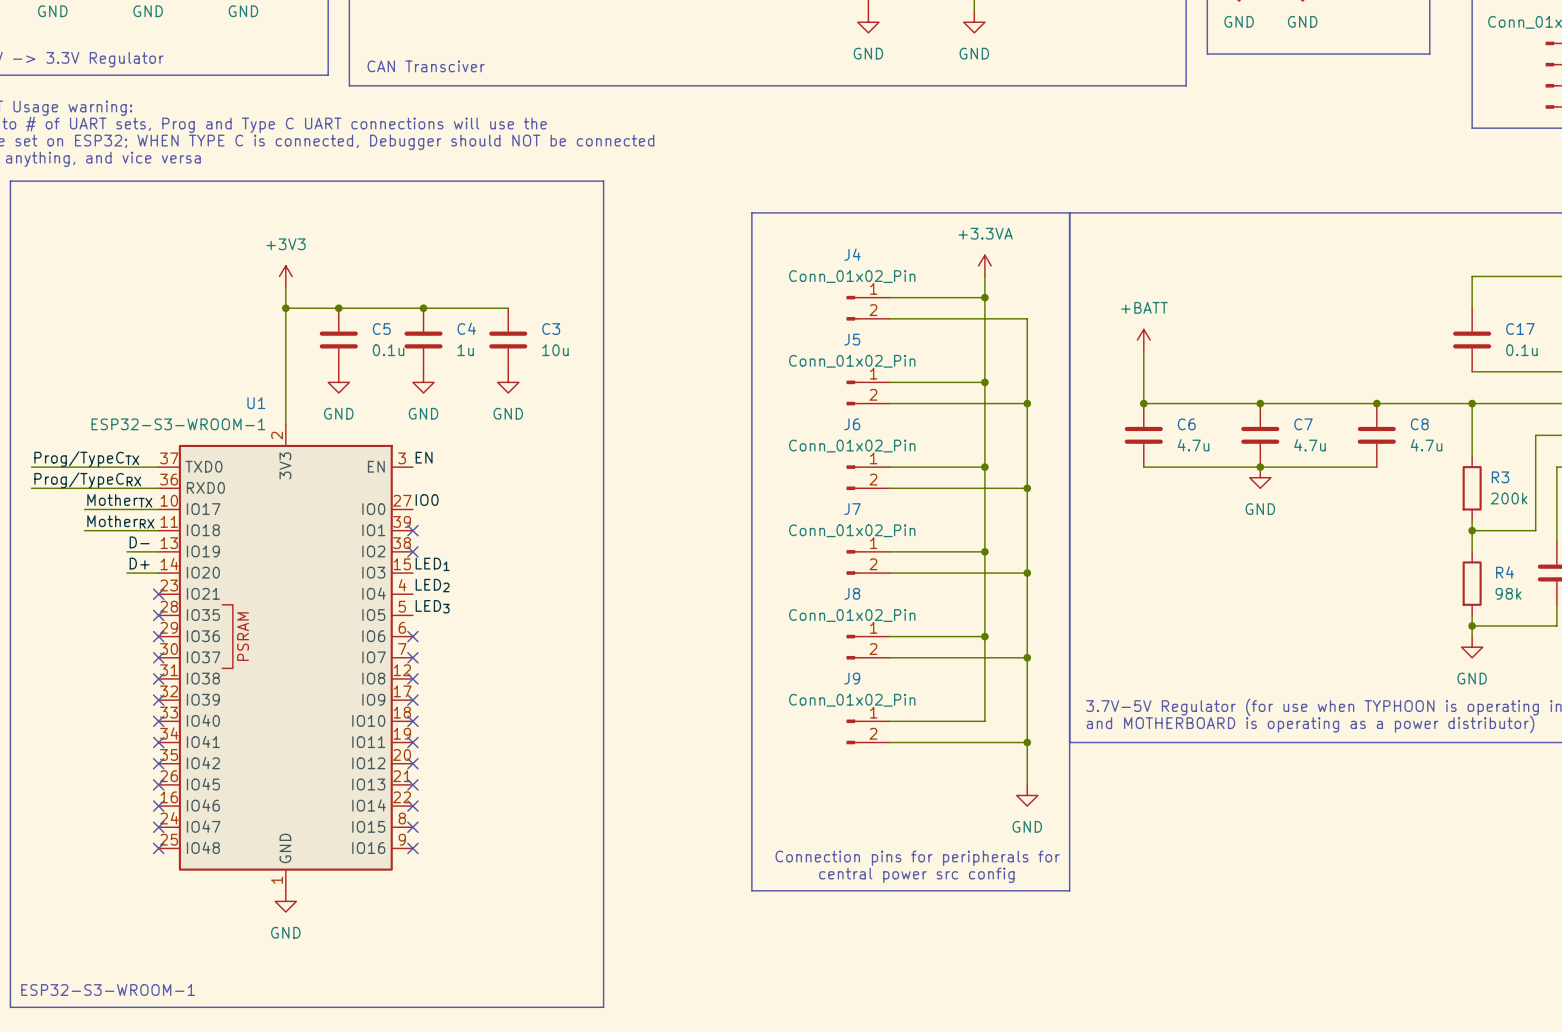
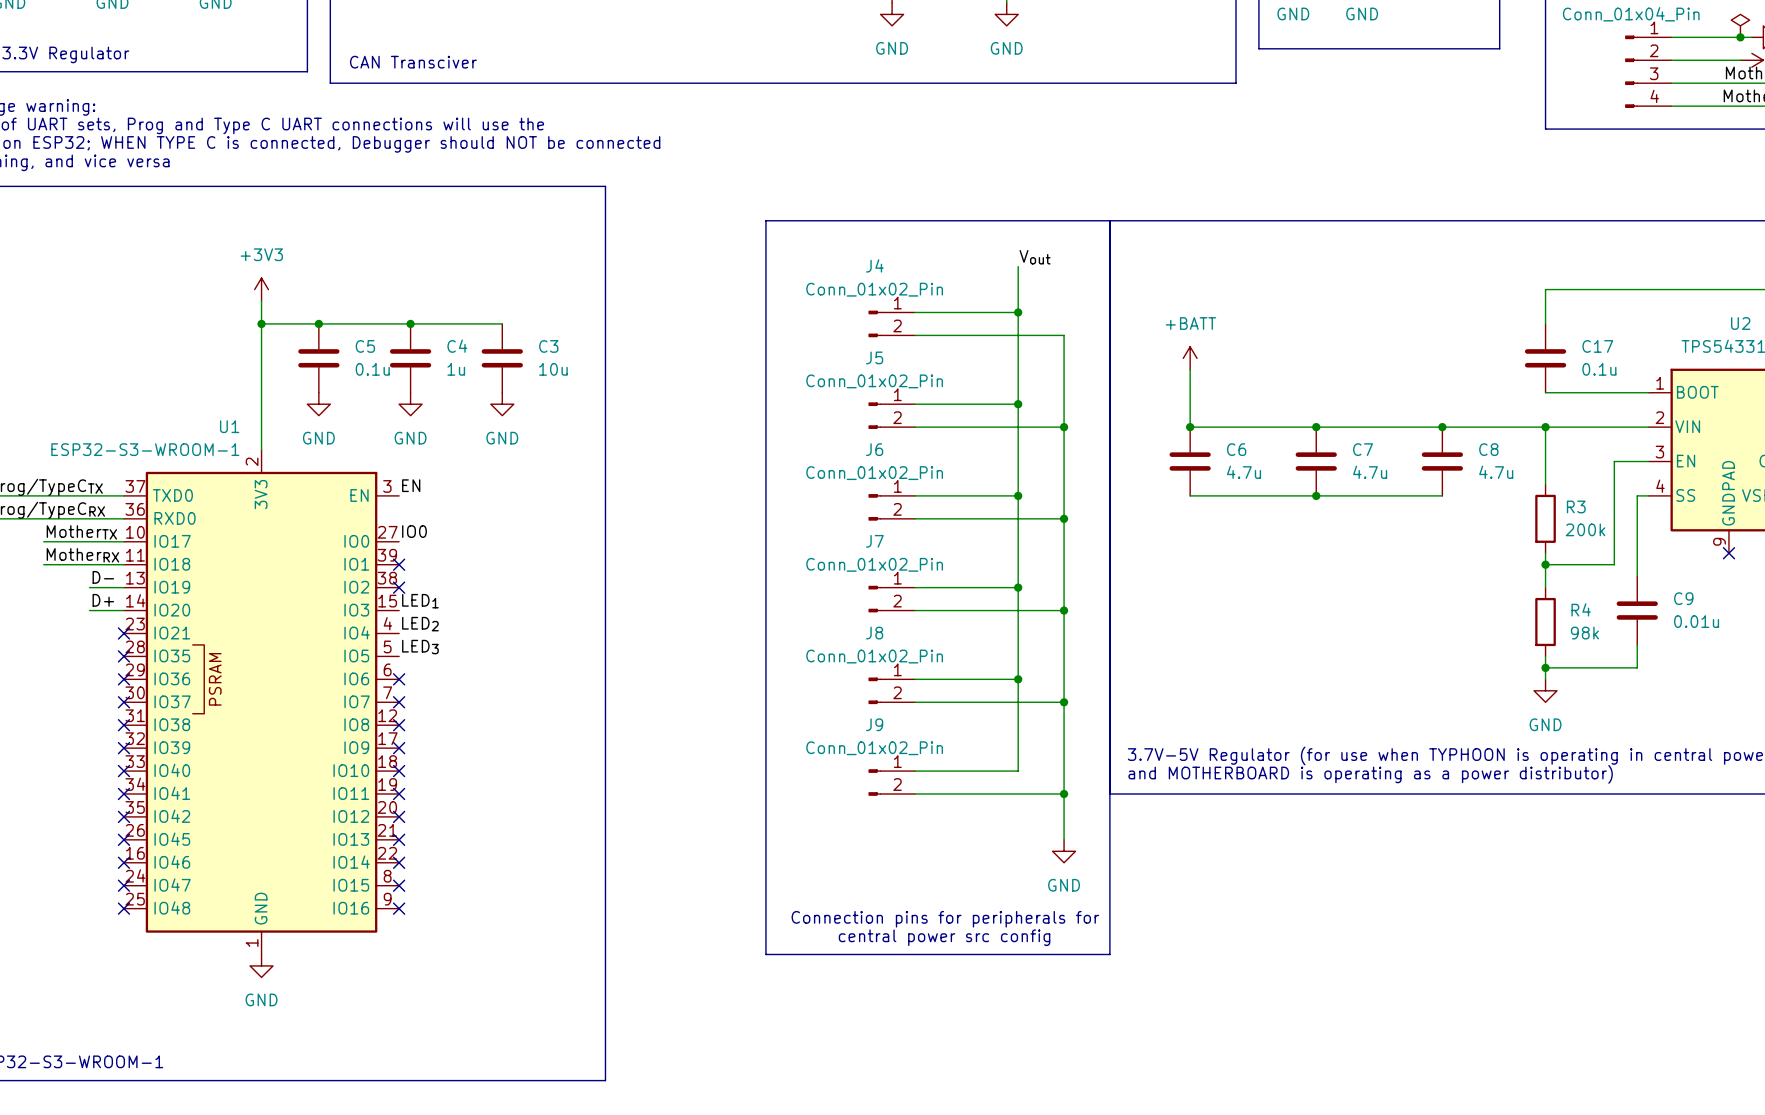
label: none -> Vout (1035, 257)
power symbol: +3.3VA (984, 265) -> none
power symbol: GND (1260, 477) -> none

